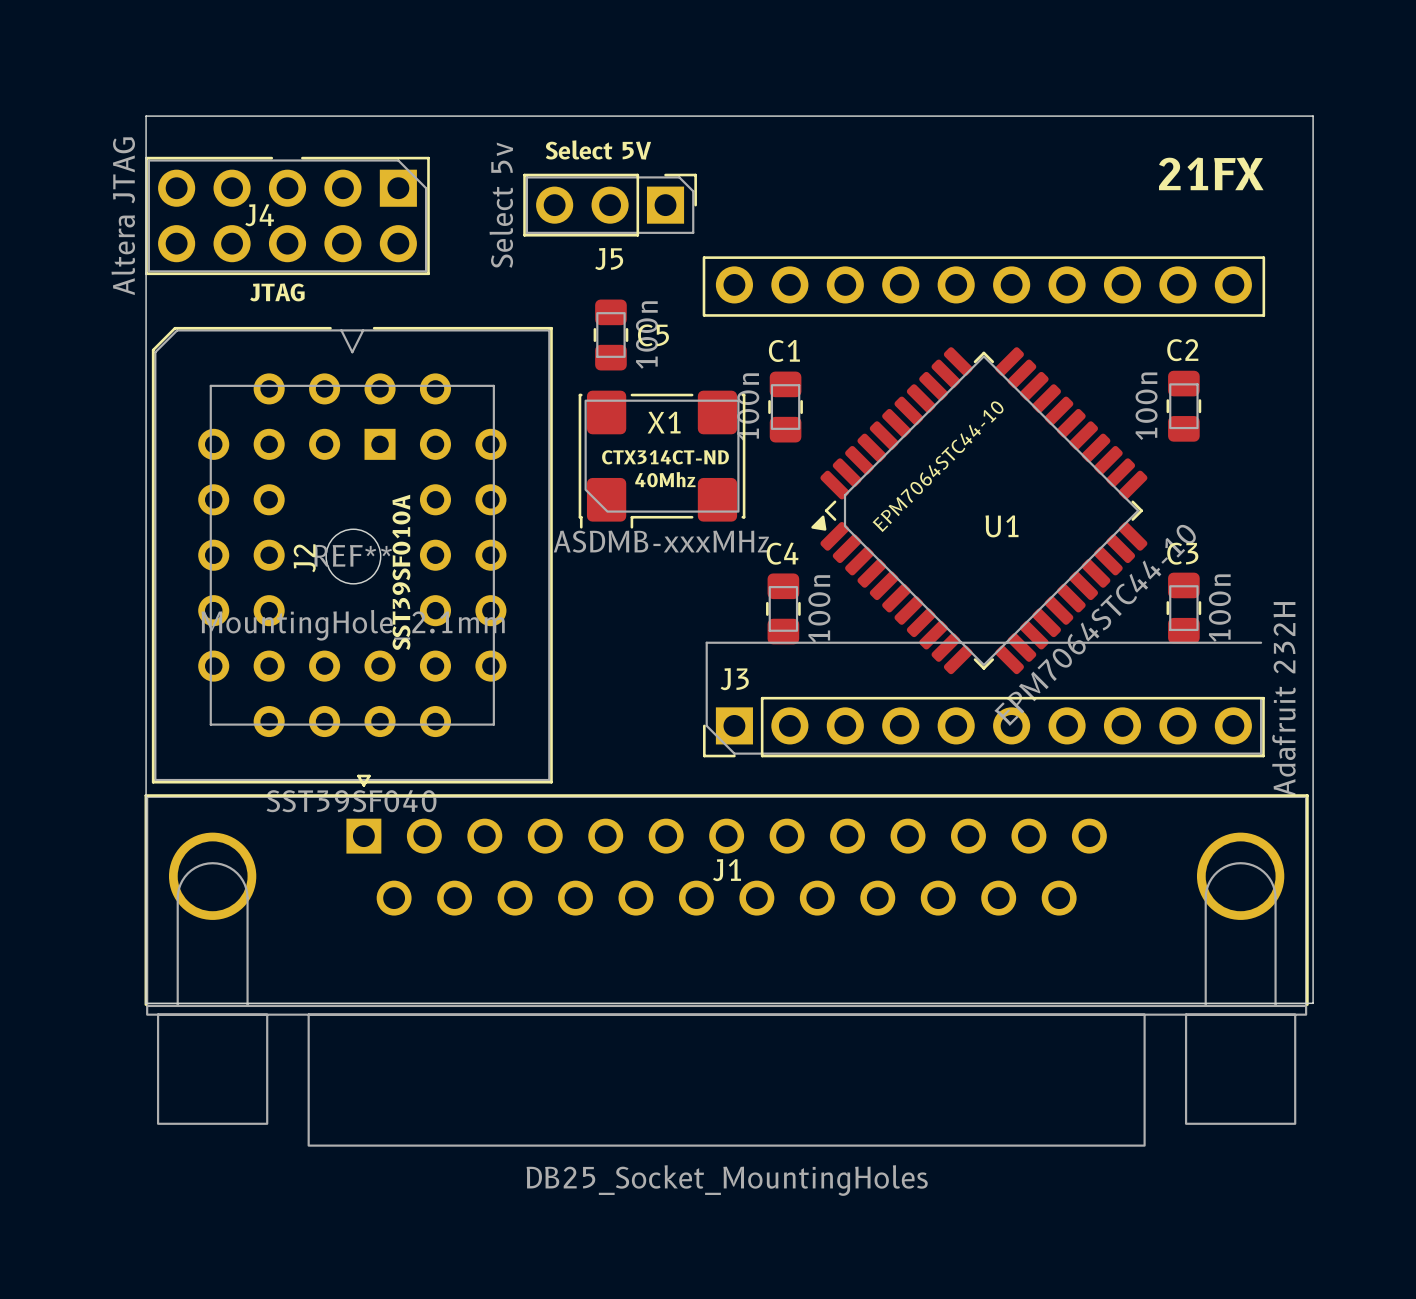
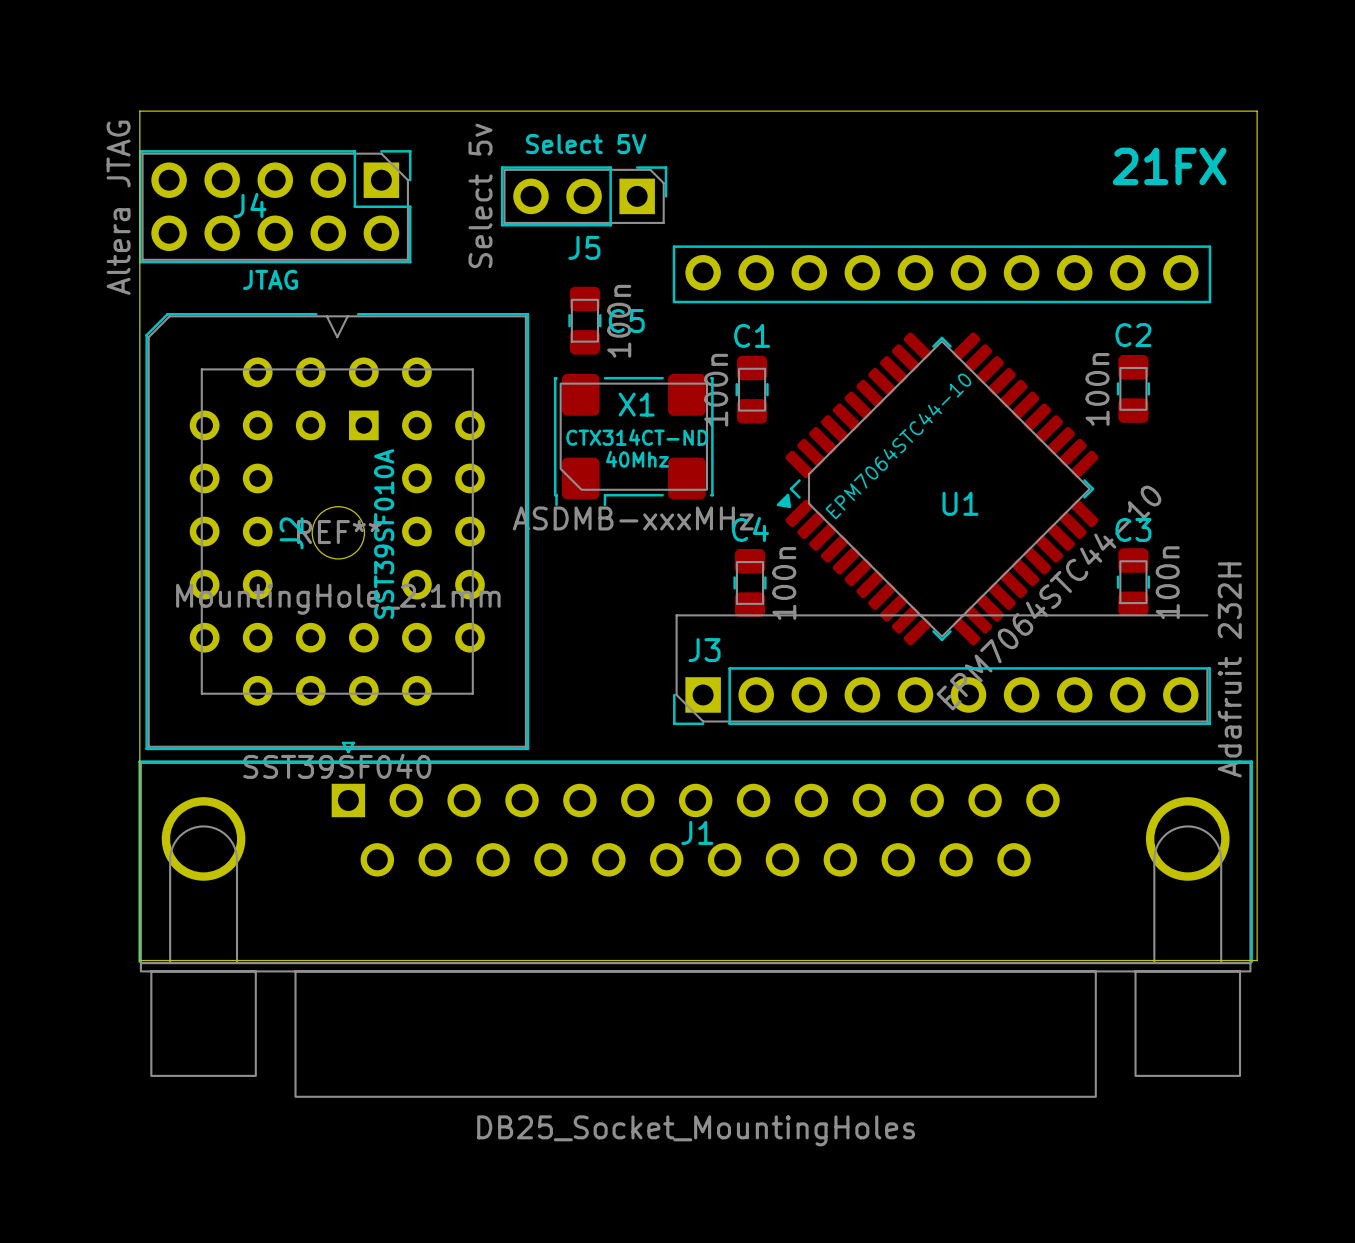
J4 footprint: [145, 156, 430, 276] -> [139, 150, 412, 264]

